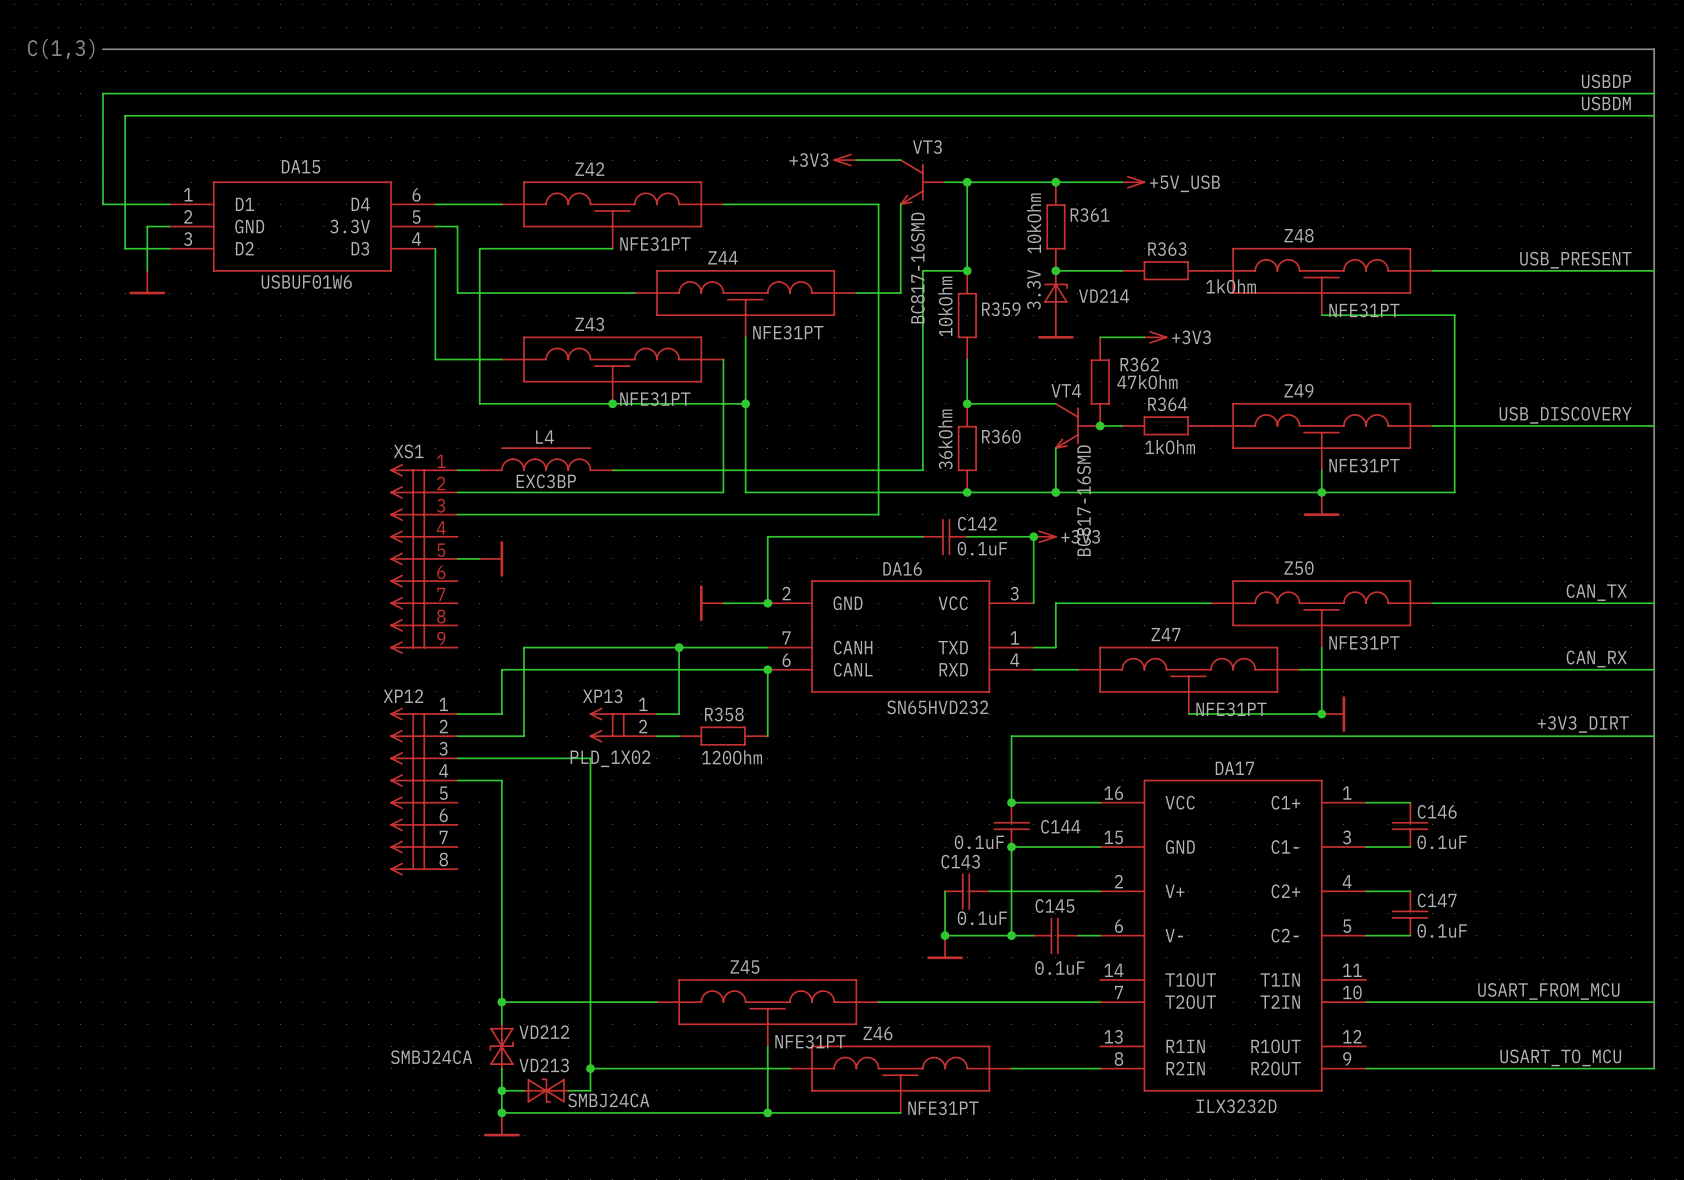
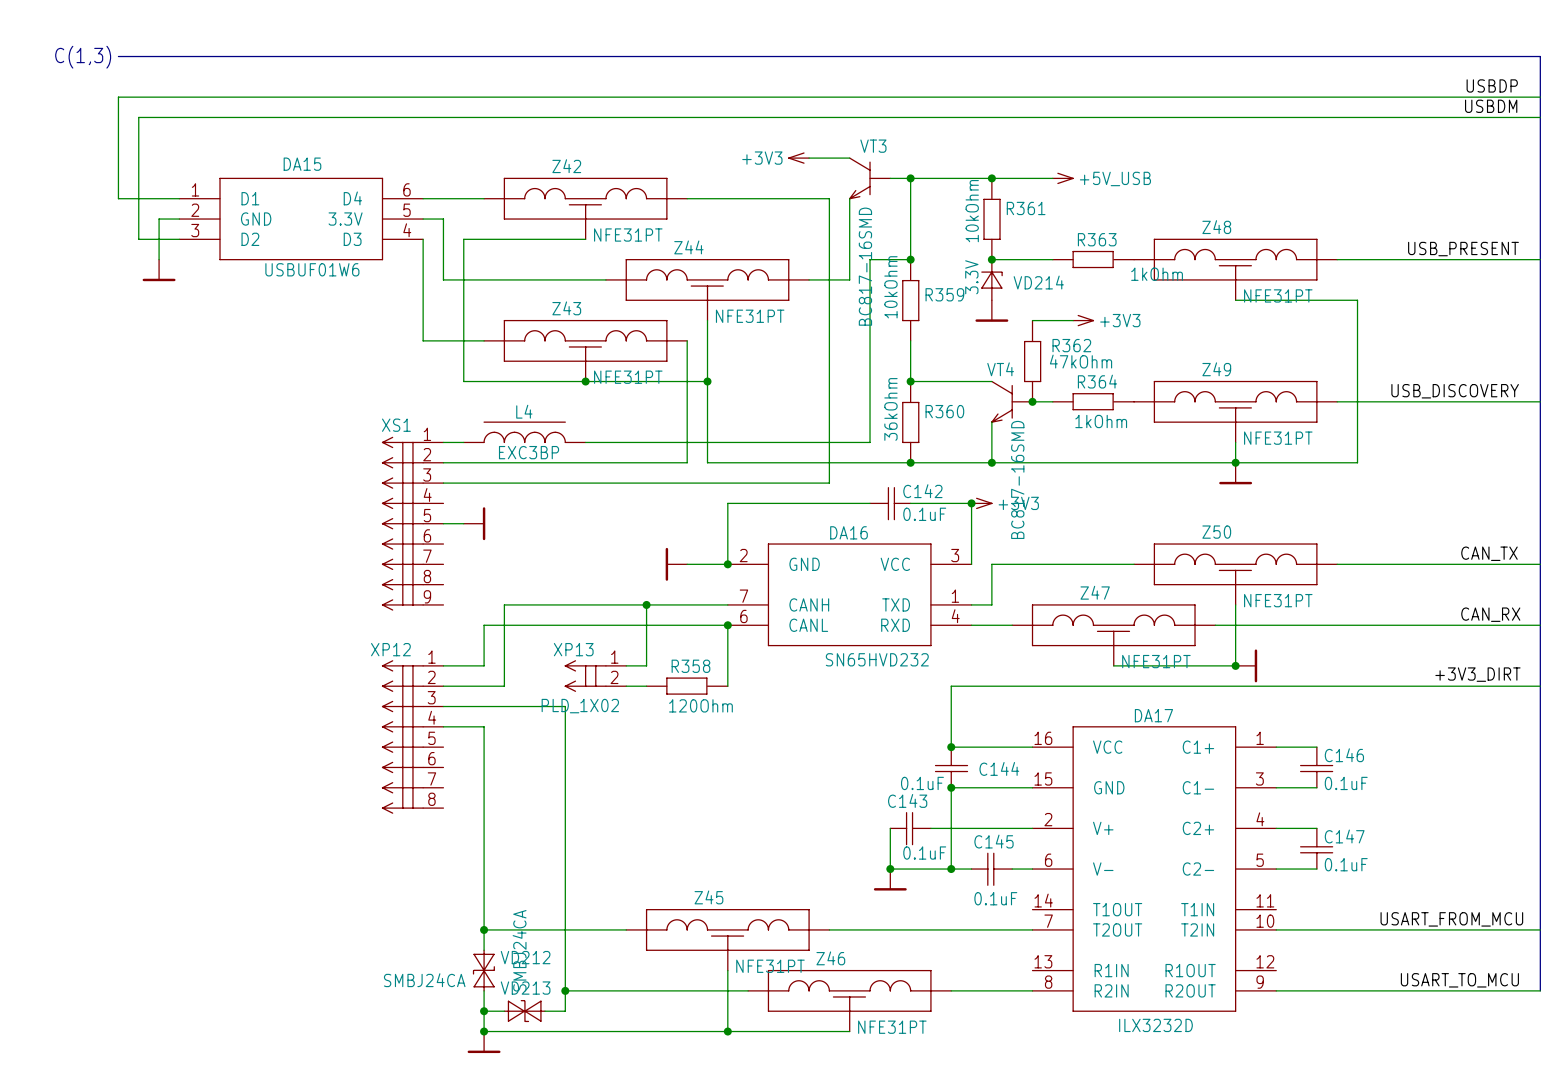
VD213 value rotation: 0° (608, 1100) -> 90° counterclockwise (519, 950)
VD213 value position: SMBJ24CA (608, 1100) -> SMBJ24CA (519, 950)

